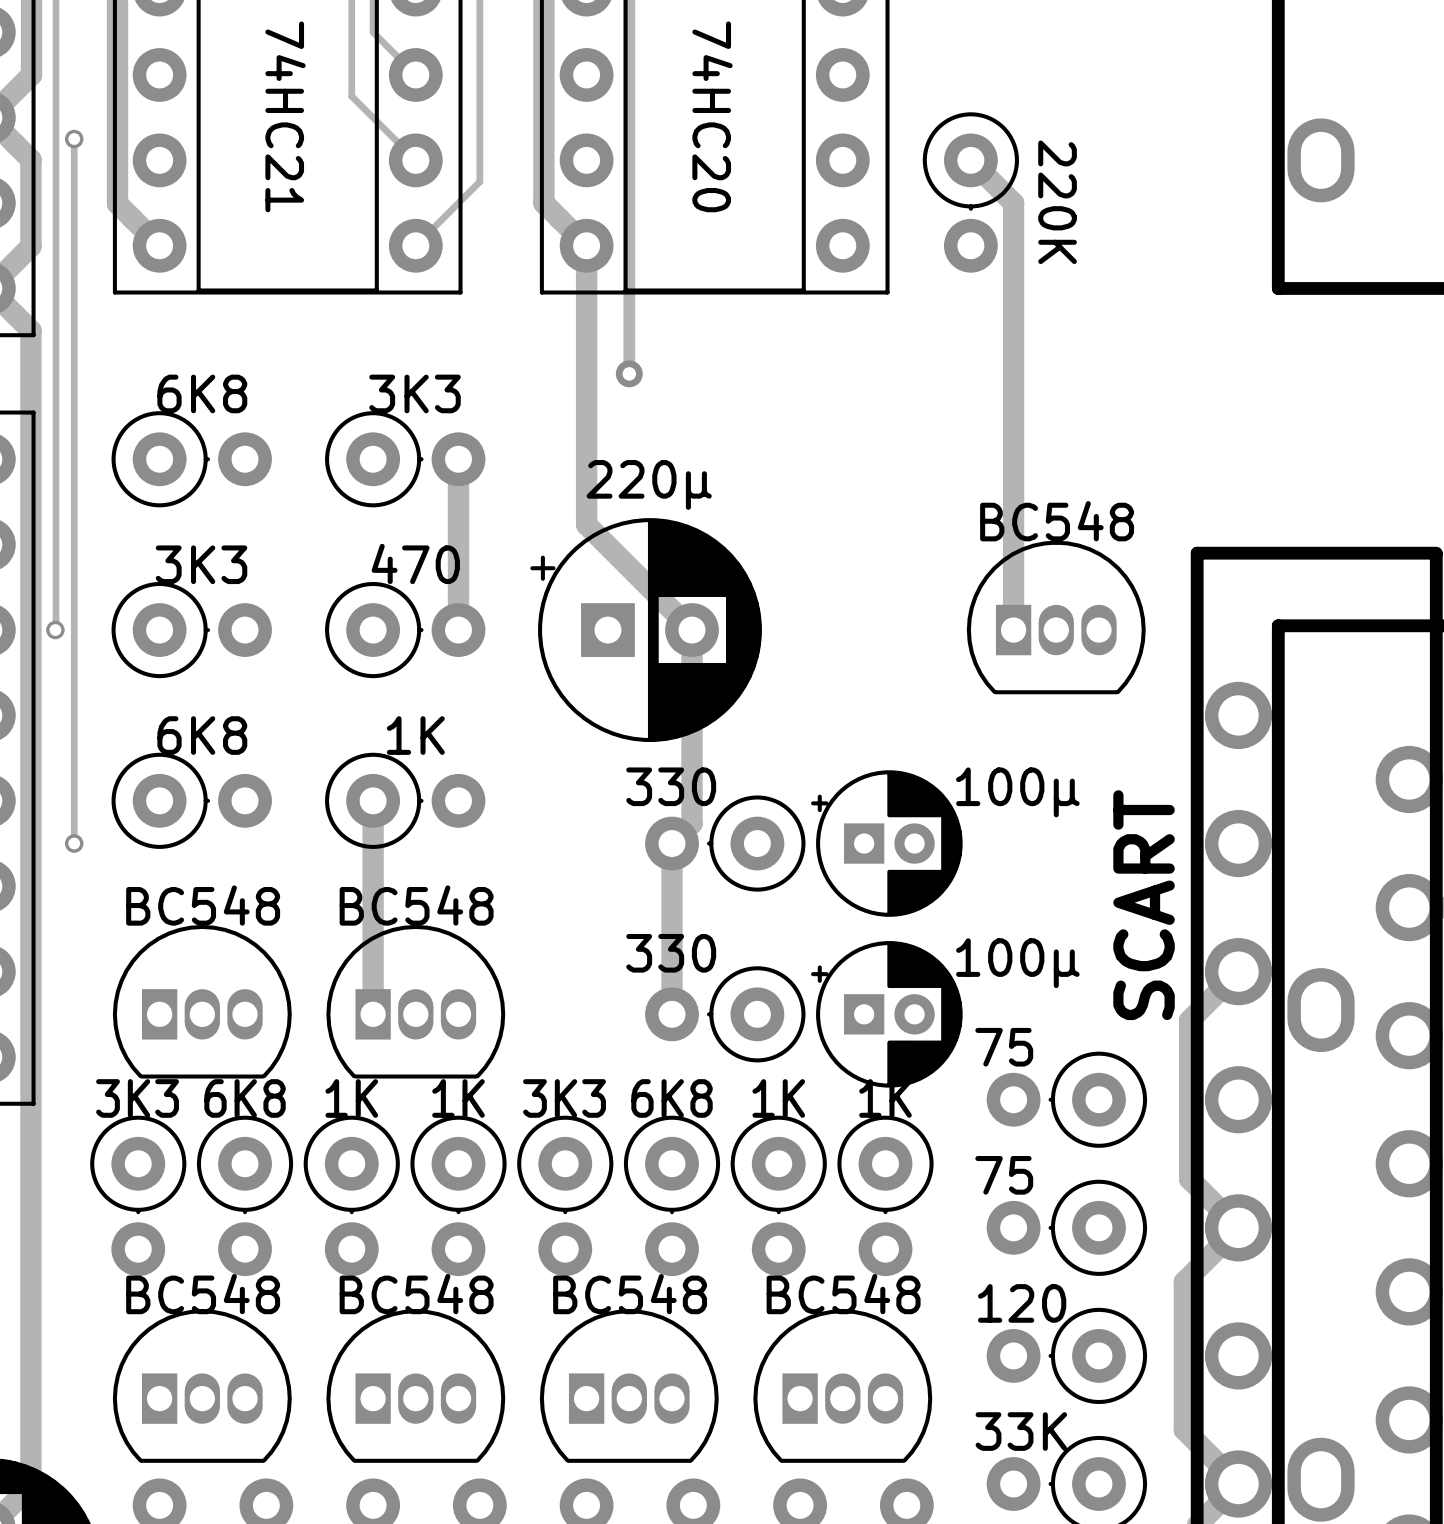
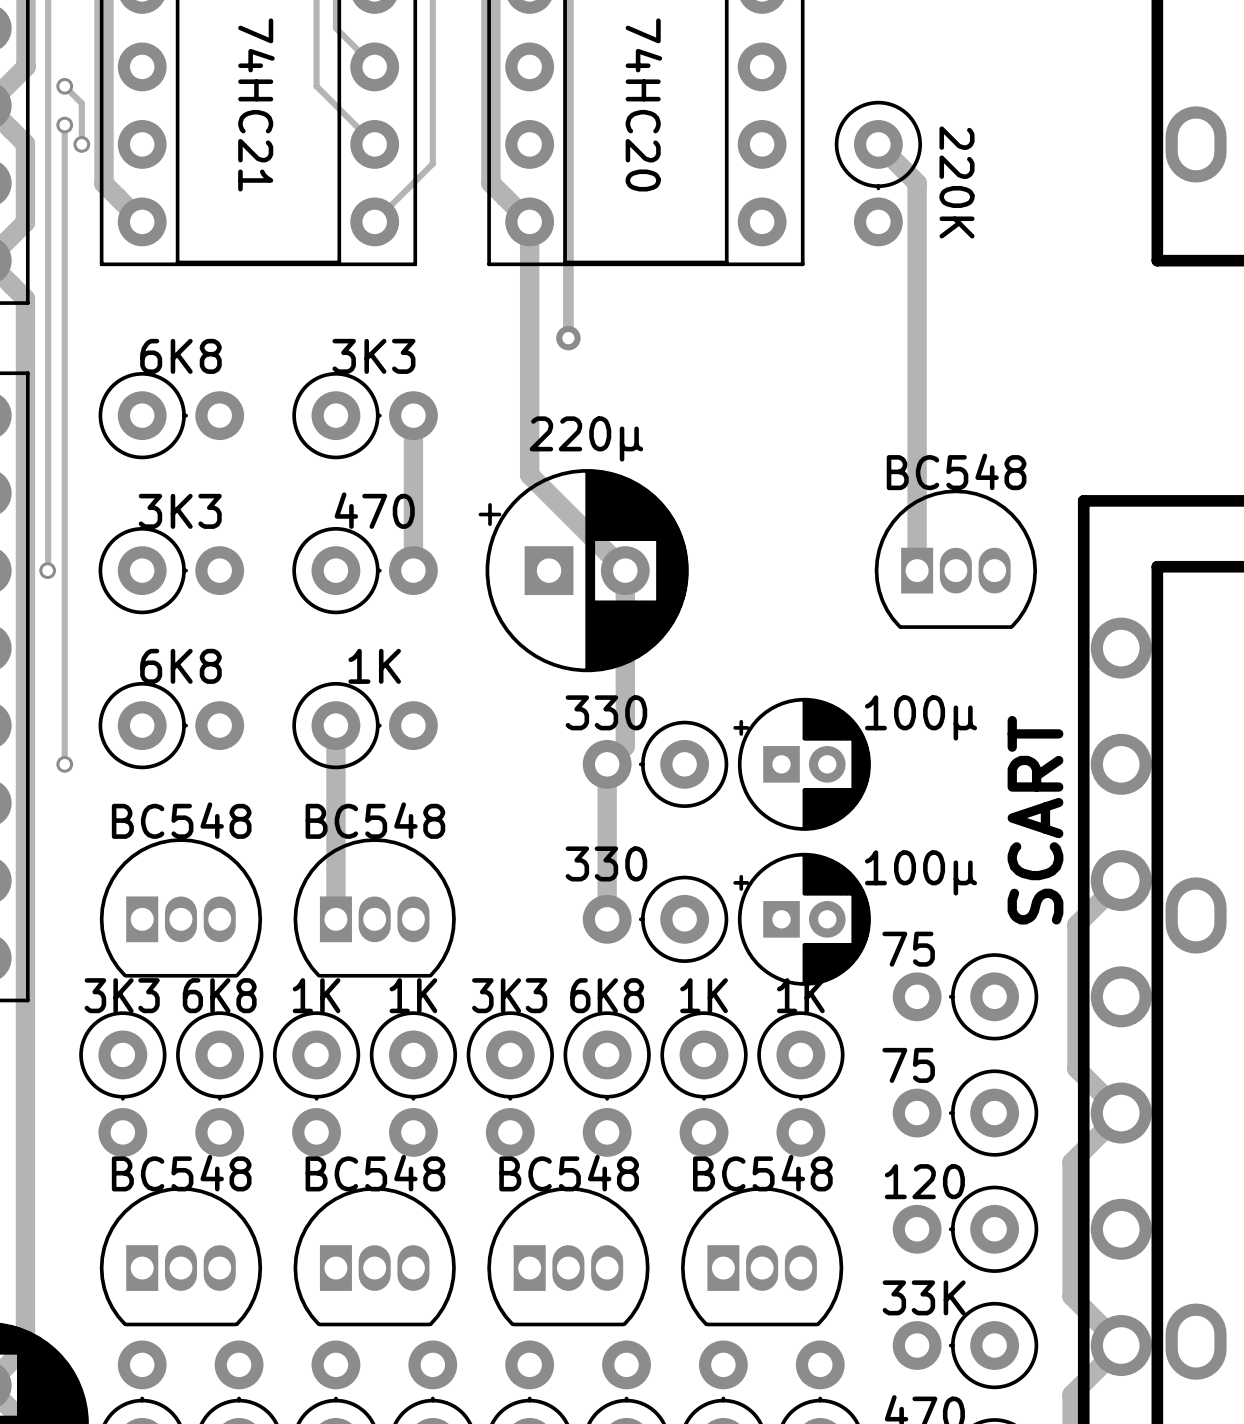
track: none -> (64, 86) (81, 103) (81, 144) (84, 142)
via: none -> (64, 86)
via: none -> (81, 144)

